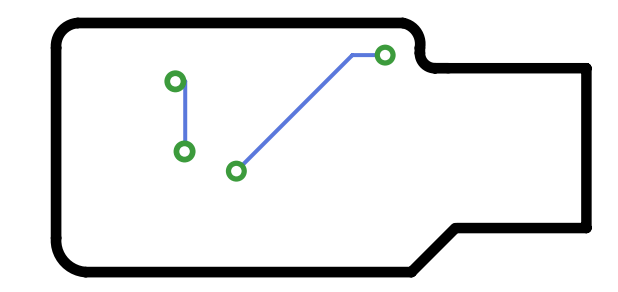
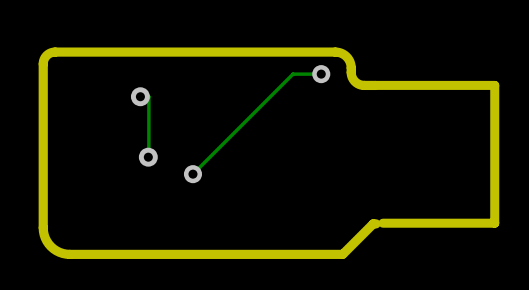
board edge: (419, 47) (419, 39) (416, 31) (410, 26) (402, 22) (77, 22) (68, 25) (59, 33) (56, 44) (56, 246) (61, 257) (66, 264) (77, 270) (85, 272) (411, 272) (455, 228) -> (351, 67) (346, 56) (335, 52) (55, 52) (46, 55) (43, 63) (43, 231) (46, 241) (56, 250) (69, 254) (342, 254)
board edge: none -> (376, 223) (373, 223) (342, 254)

